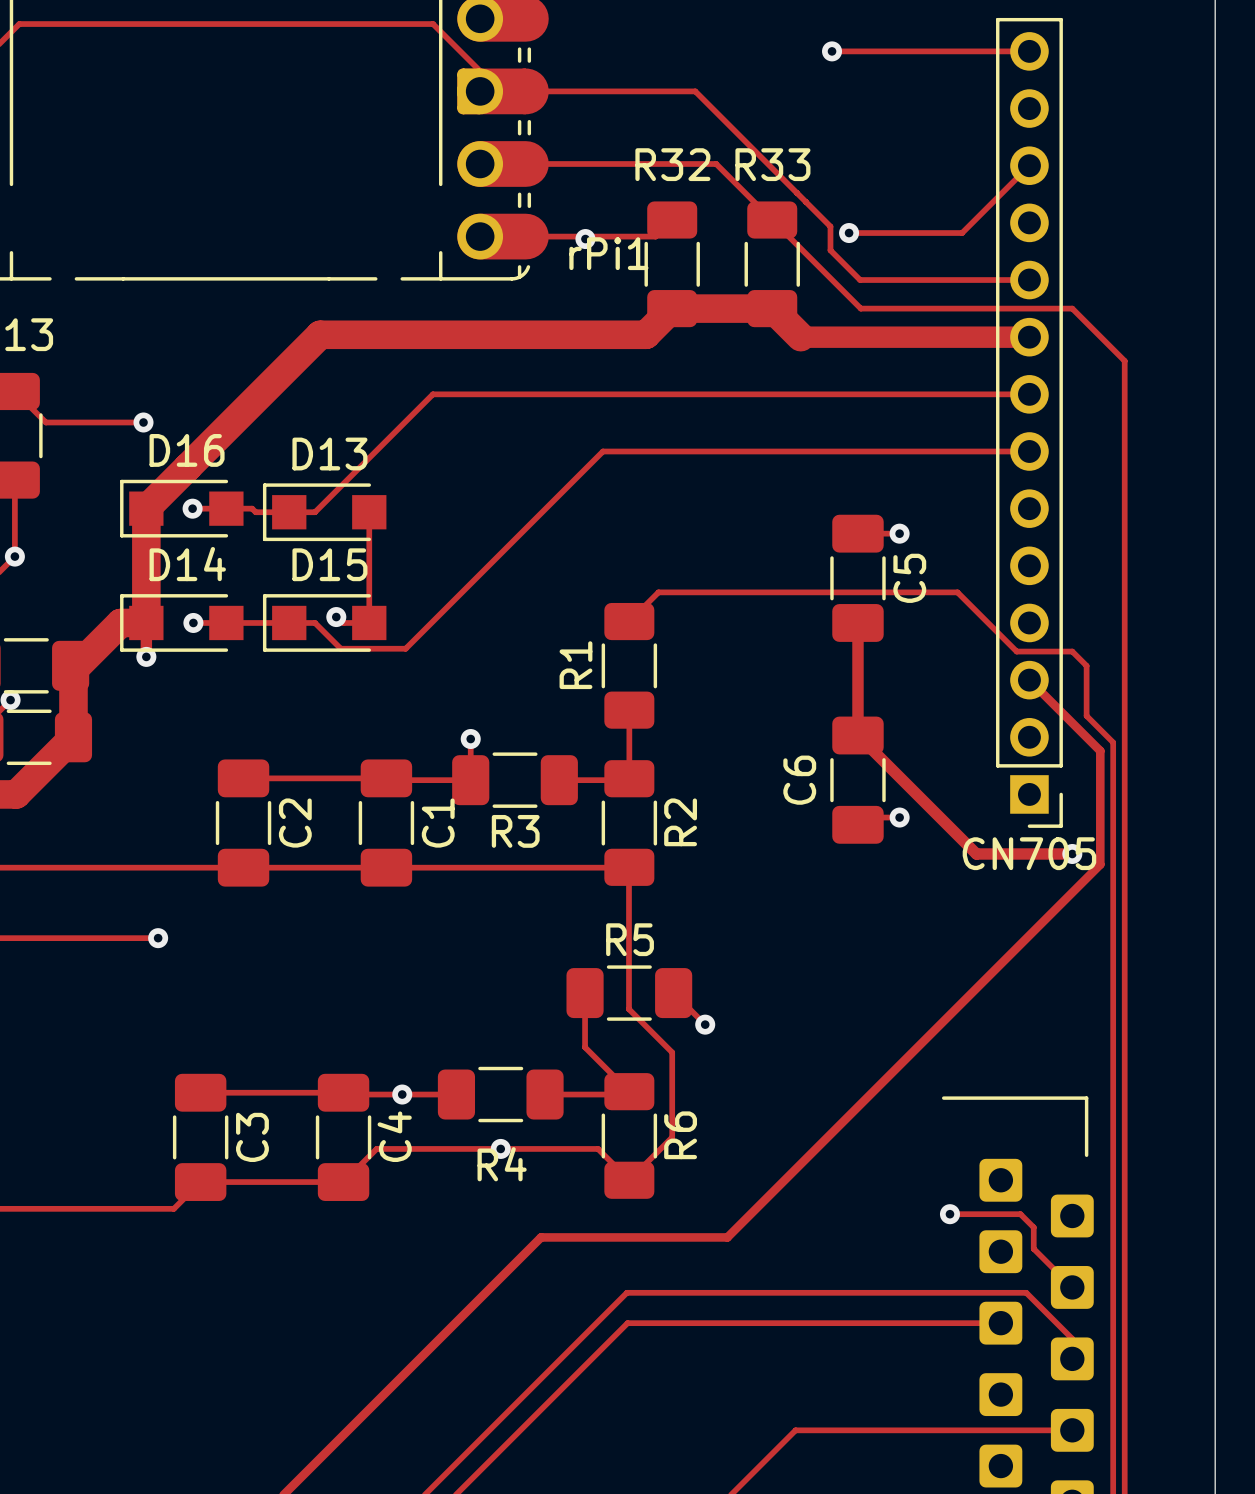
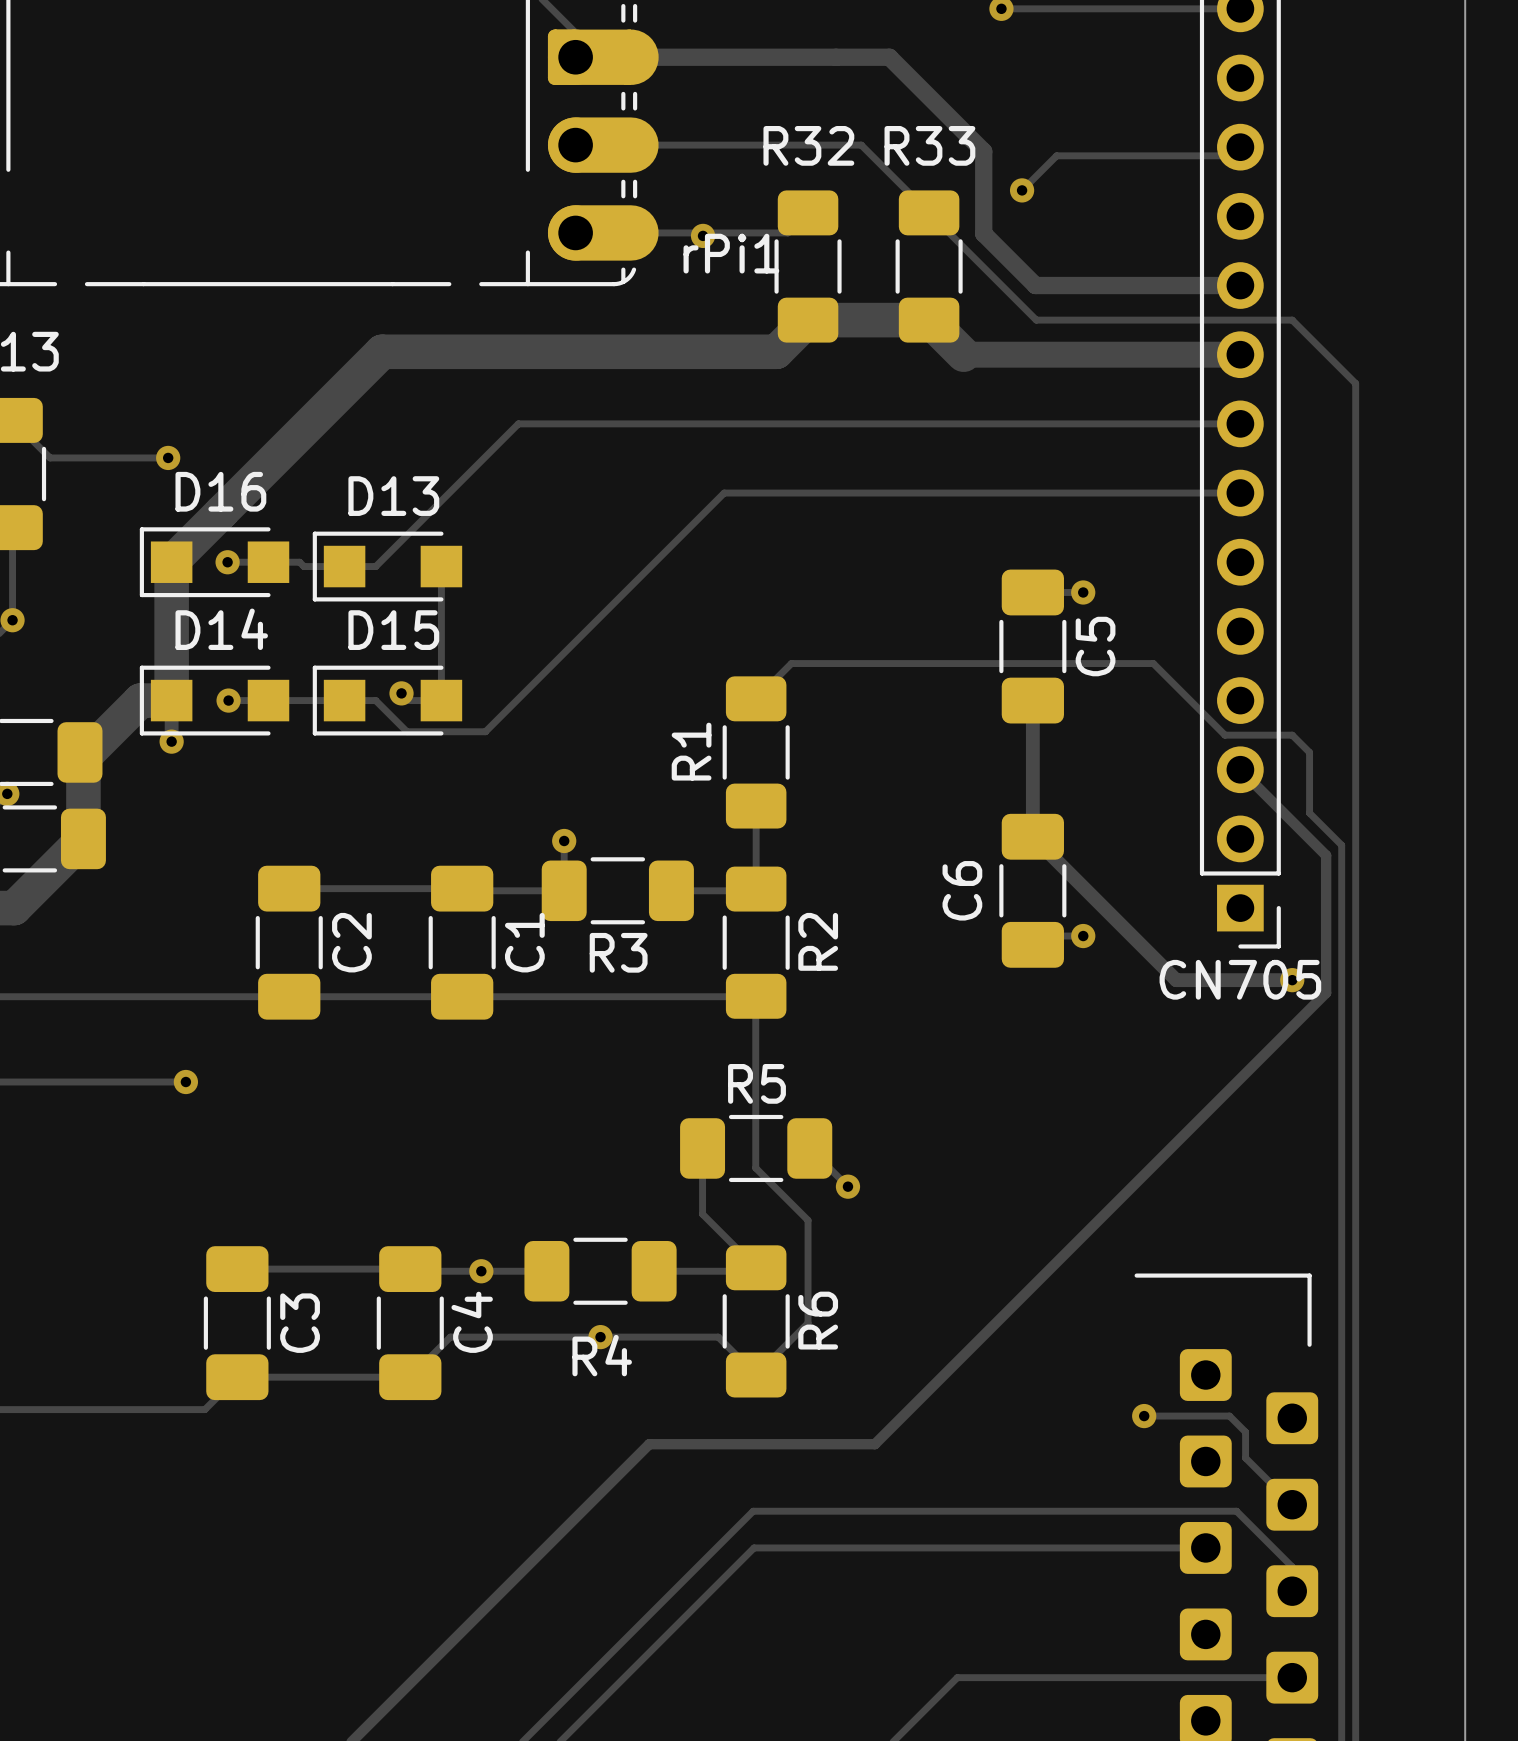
track width: thin (503, 91) (695, 91) -> thick (603, 57) (836, 57)
track: (695, 91) (830, 226) (830, 250) -> (836, 57) (889, 57) (983, 151) (983, 233) (999, 249)
track: (1022, 172) (962, 233) (849, 233) -> (1231, 155) (1056, 155) (1022, 190)
via position: (849, 233) -> (1022, 190)
track width: thin (830, 250) (860, 280) (1029, 280) -> thick (999, 249) (1035, 285) (1240, 285)

